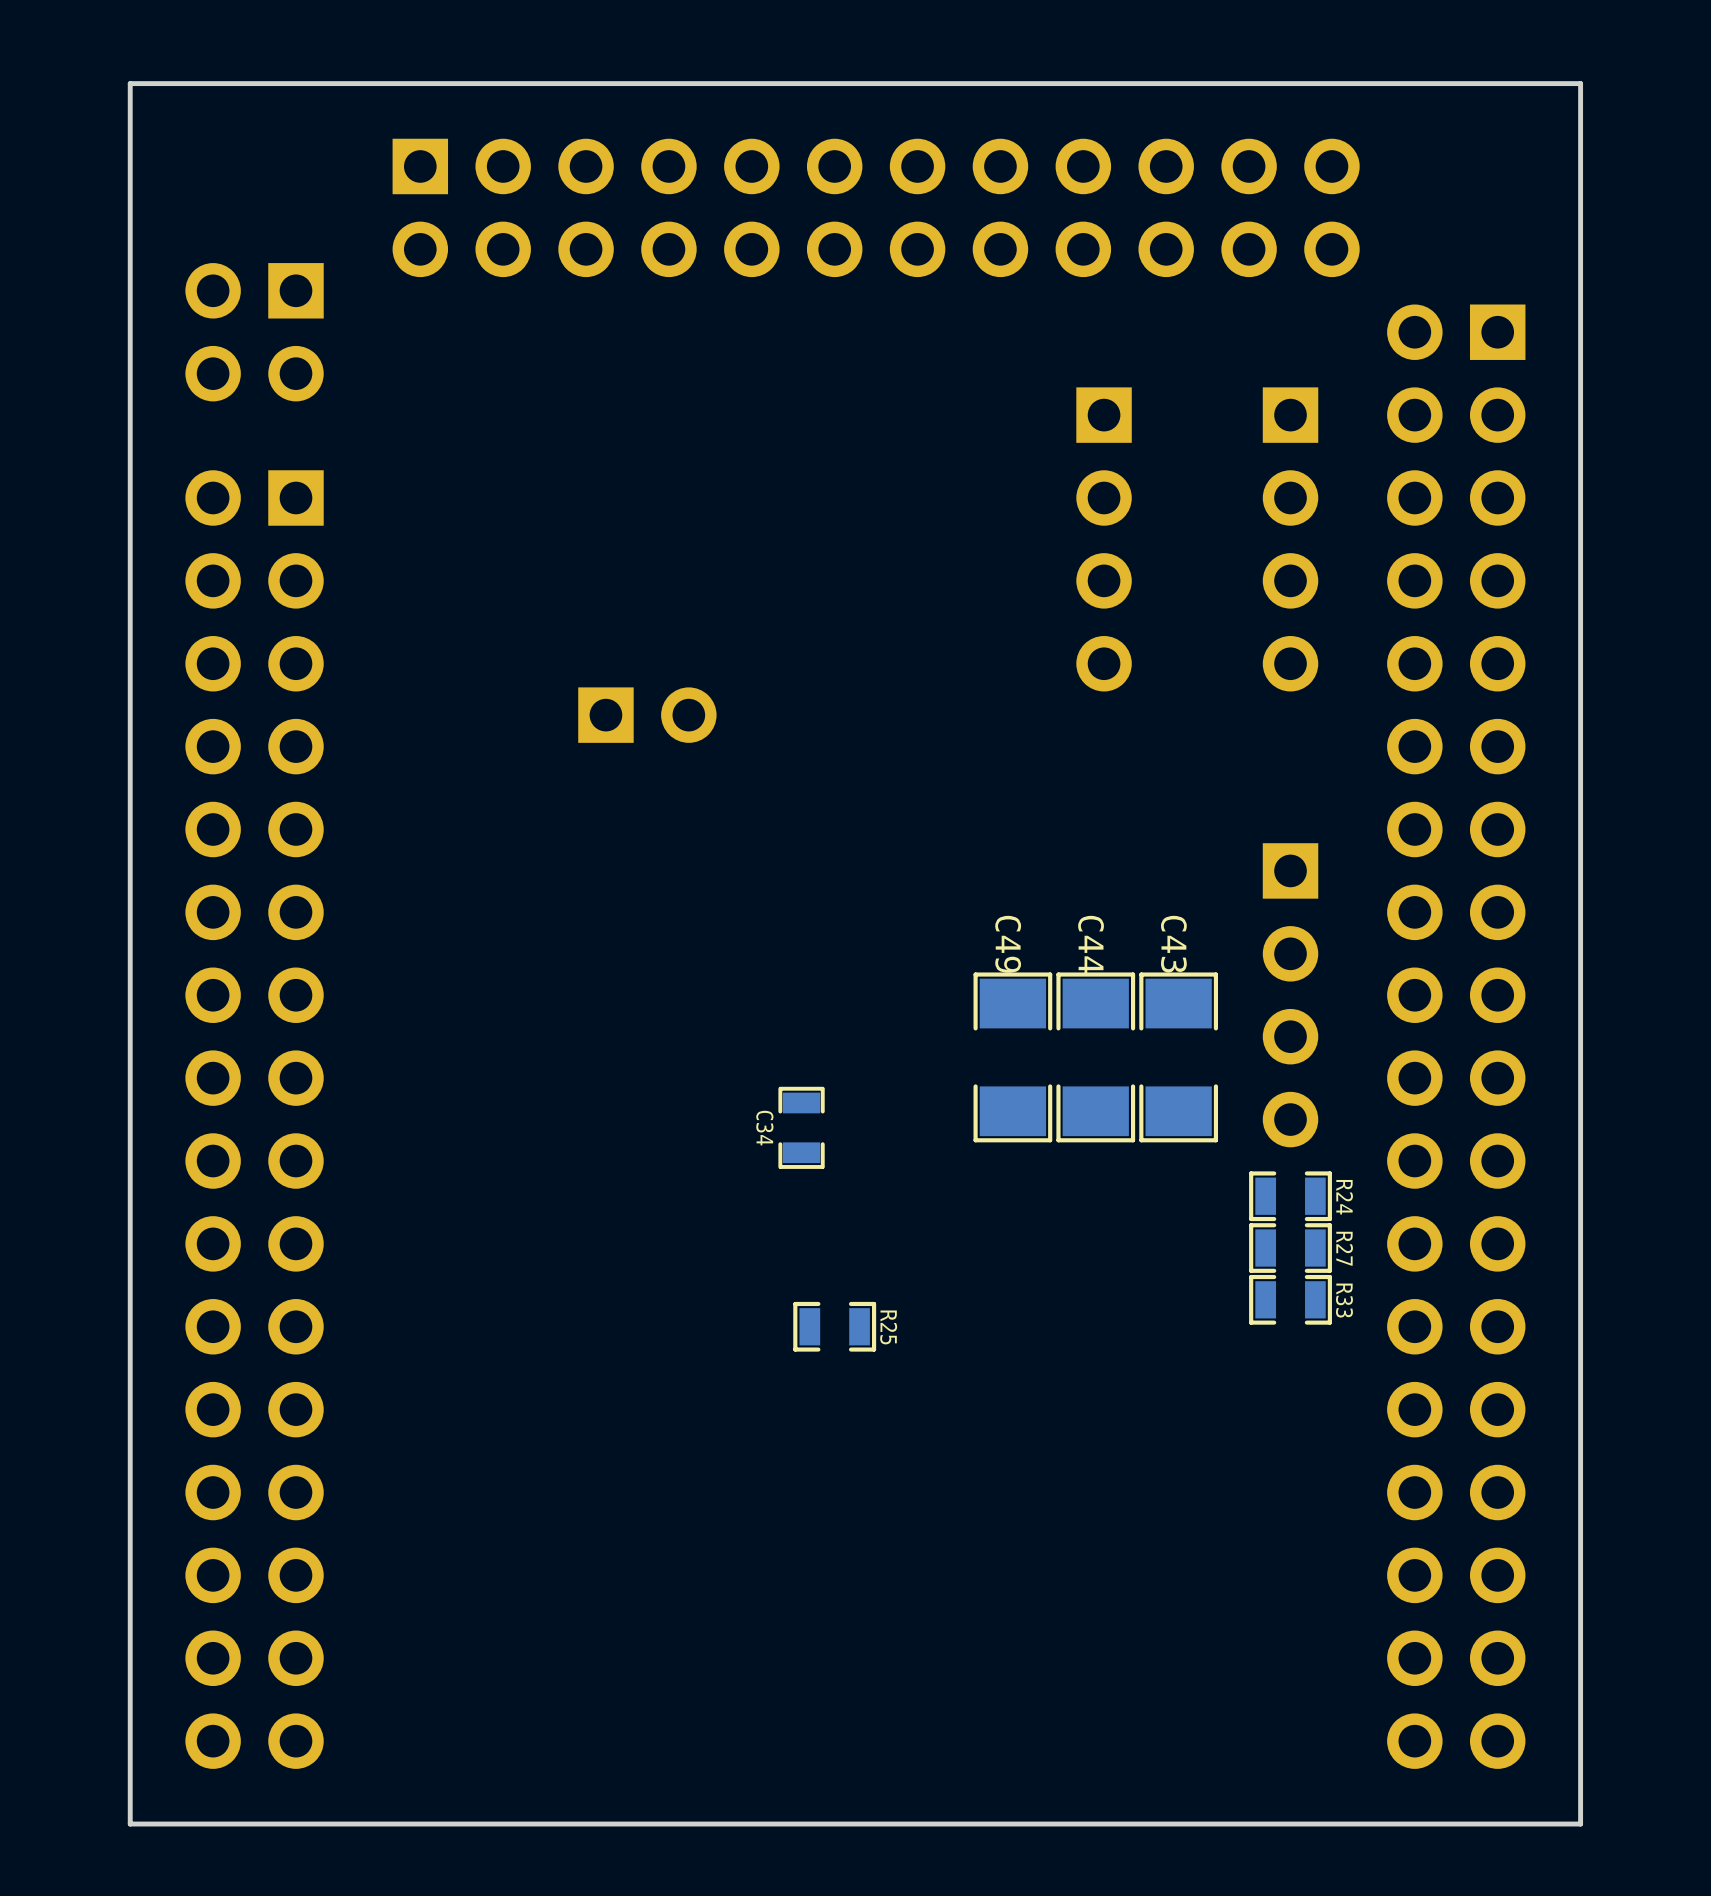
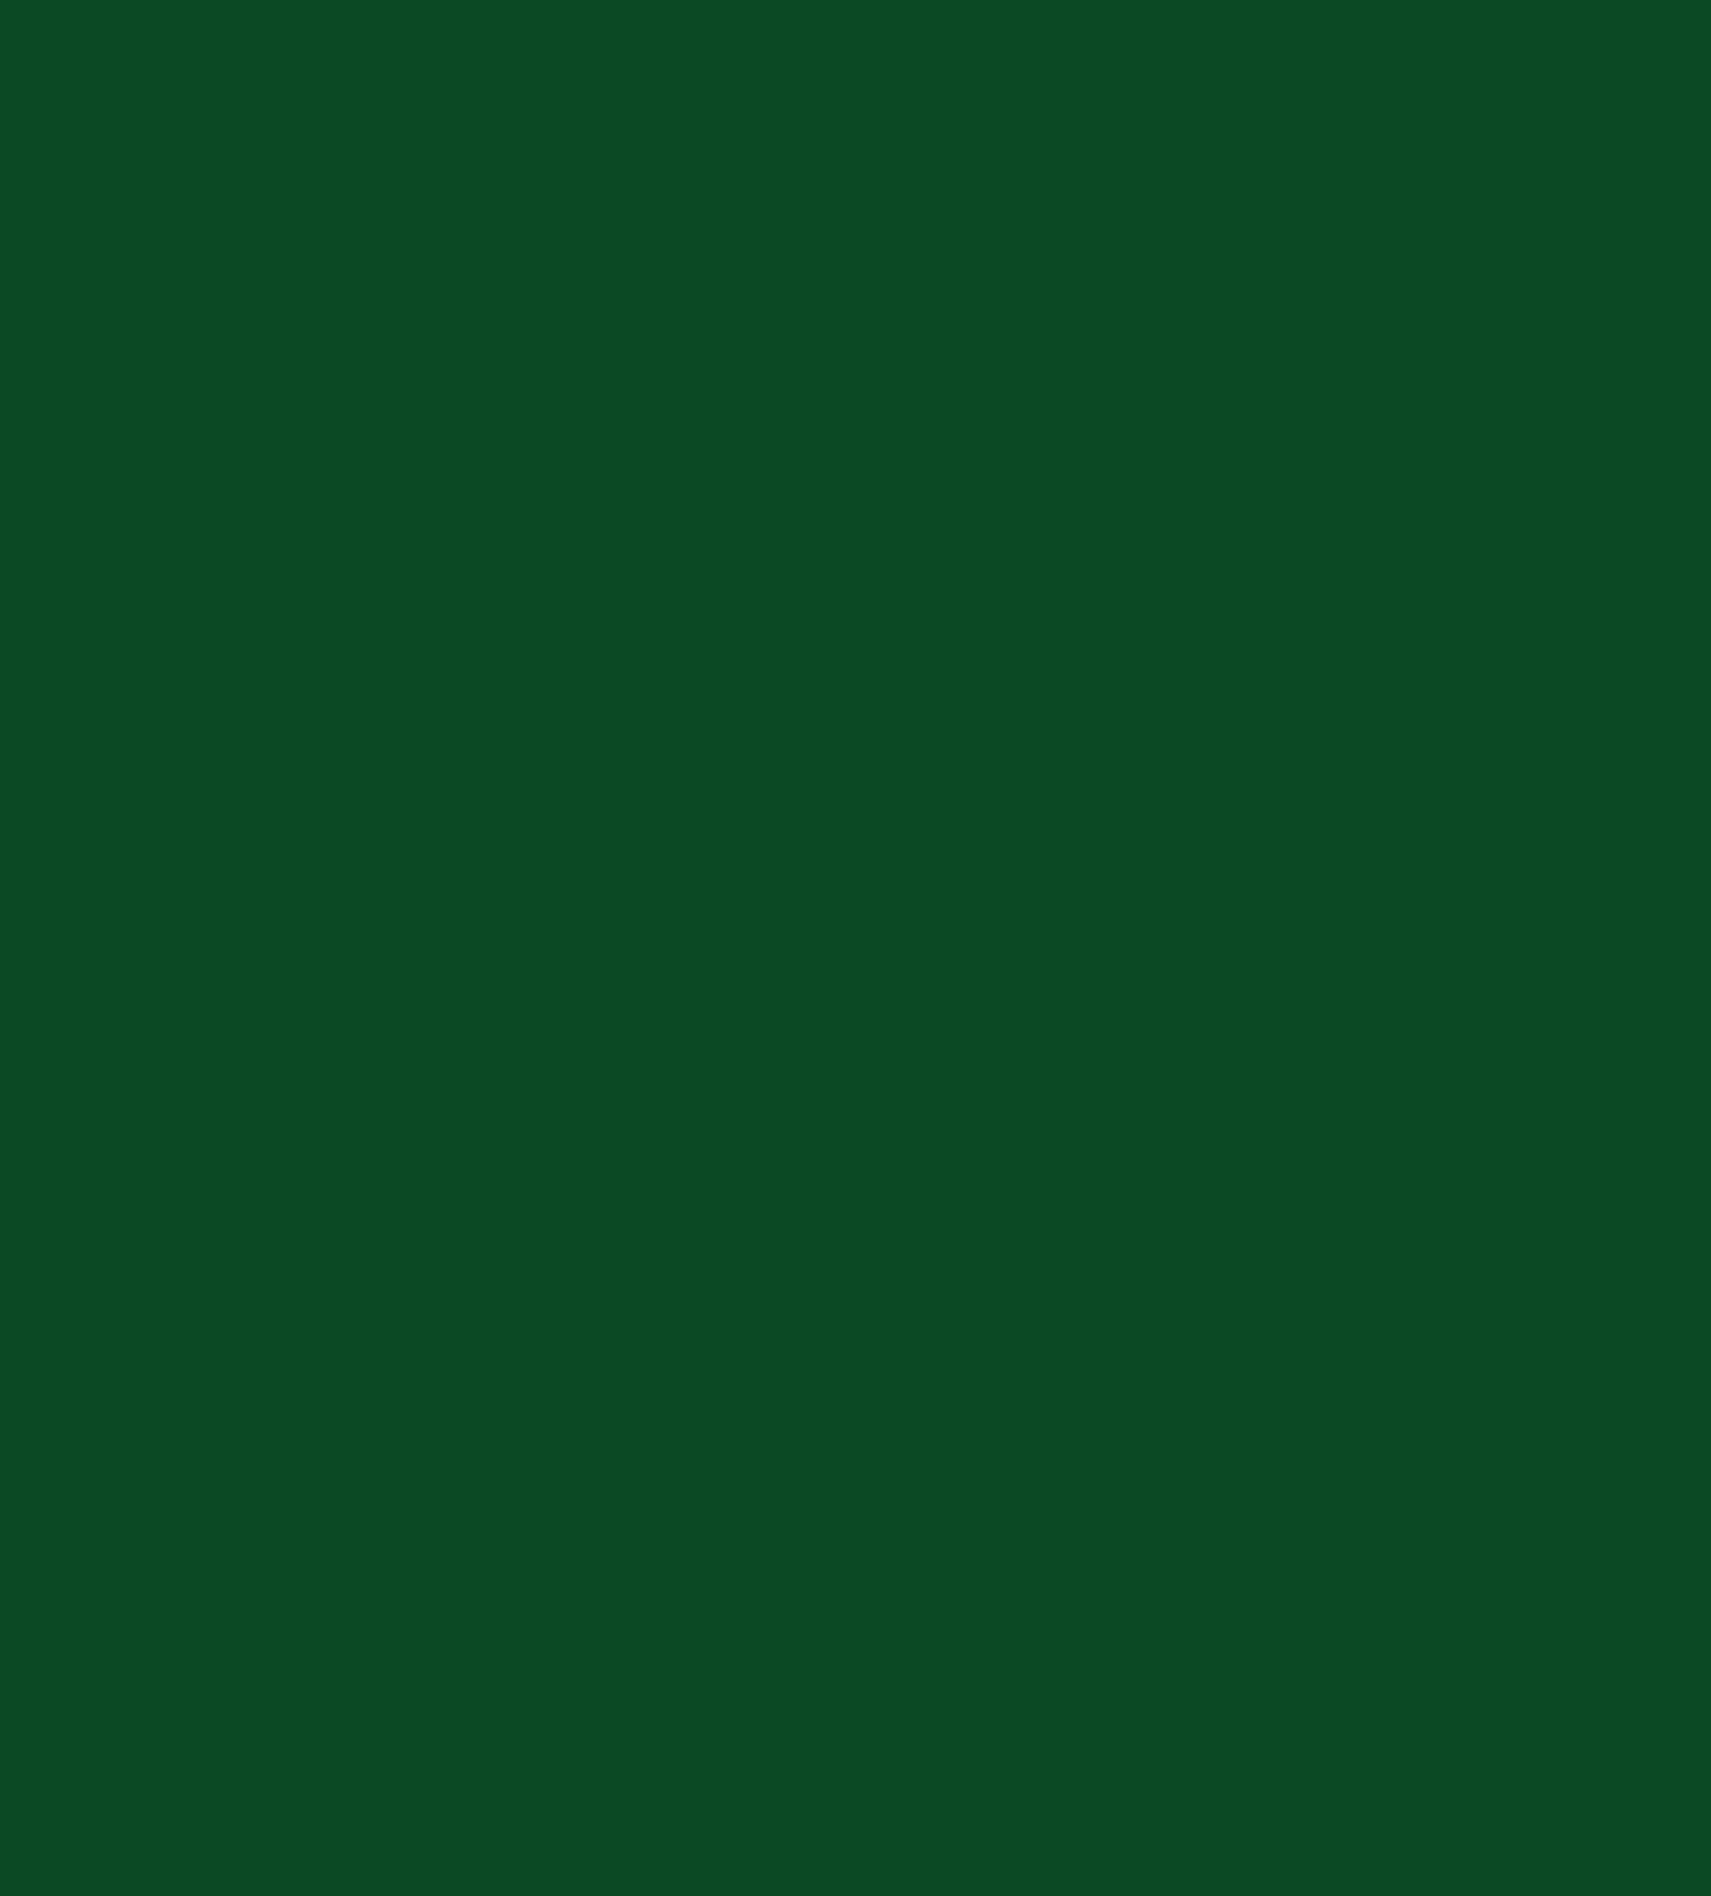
board edge: (1580, 83) (130, 83) (130, 1824) (1580, 1824) (1580, 83) -> none
part: (876, 207) -> none
part: (254, 332) -> none
part: (1104, 539) -> none
part: (1290, 539) -> none
part: (647, 715) -> none
part: (1290, 995) -> none
part: (1456, 1036) -> none
C49: (1012, 1057) -> none
C44: (1095, 1057) -> none
C43: (1178, 1057) -> none
part: (254, 1119) -> none
C34: (801, 1127) -> none
R24: (1290, 1196) -> none
R27: (1290, 1248) -> none
R33: (1290, 1299) -> none
R25: (834, 1326) -> none

